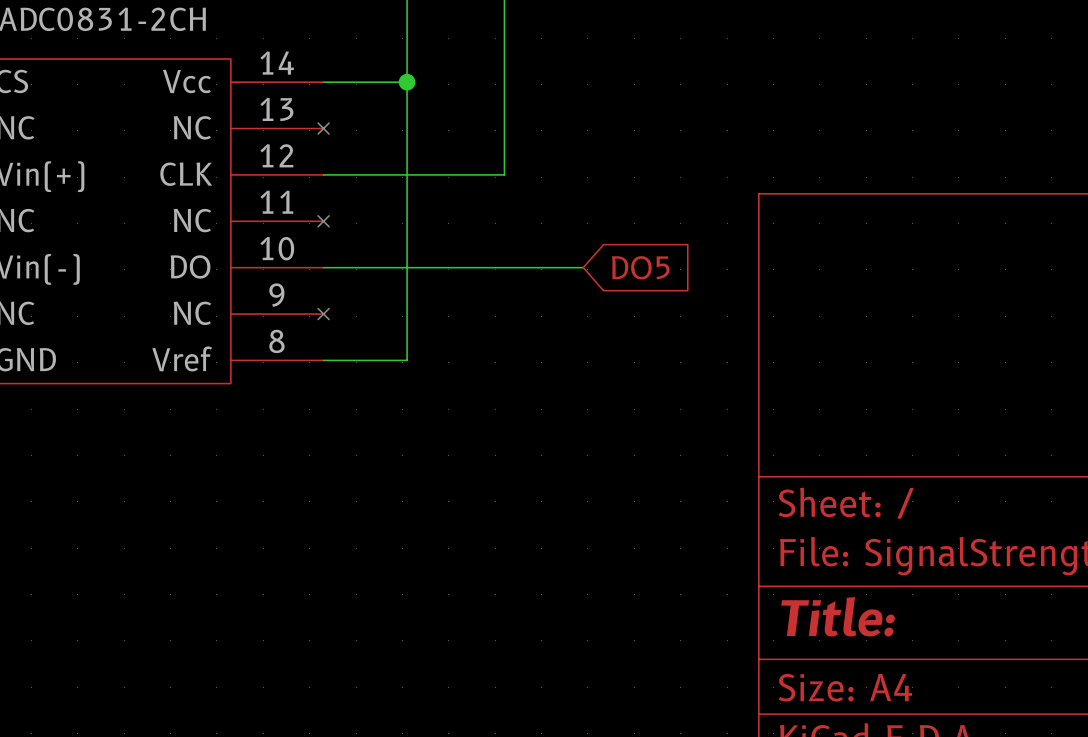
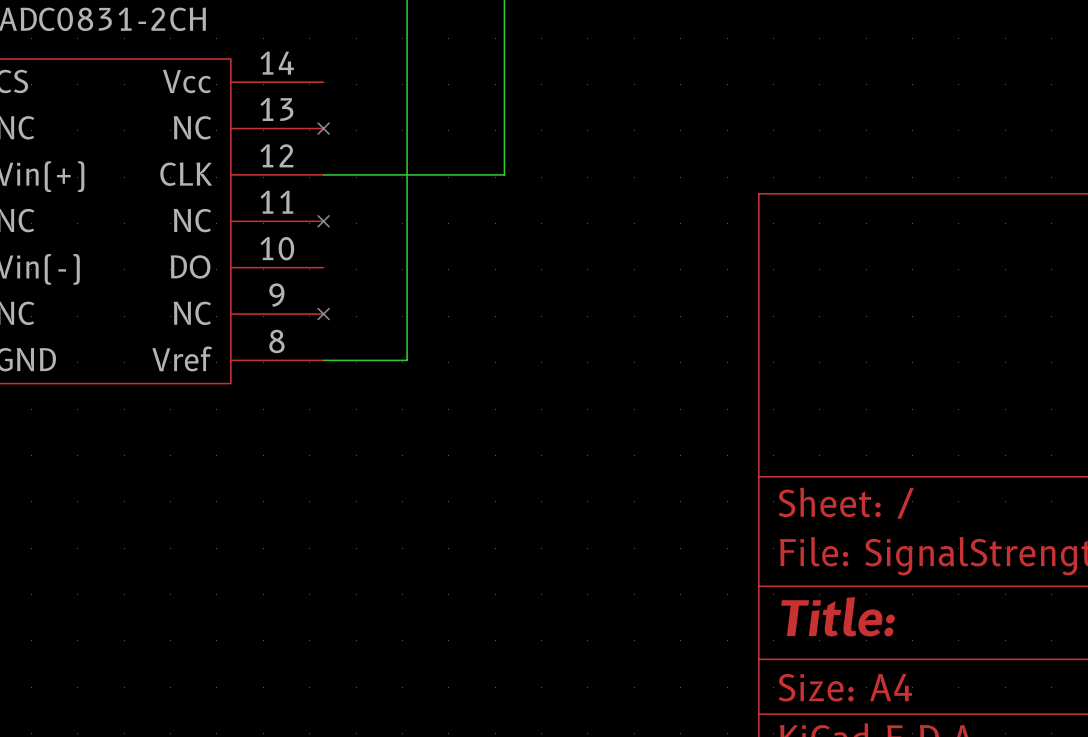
wire: (323, 82) (407, 82) -> none
junction: (407, 82) -> none
wire: (323, 267) (583, 267) -> none
global label: DO5 (640, 267) -> none

